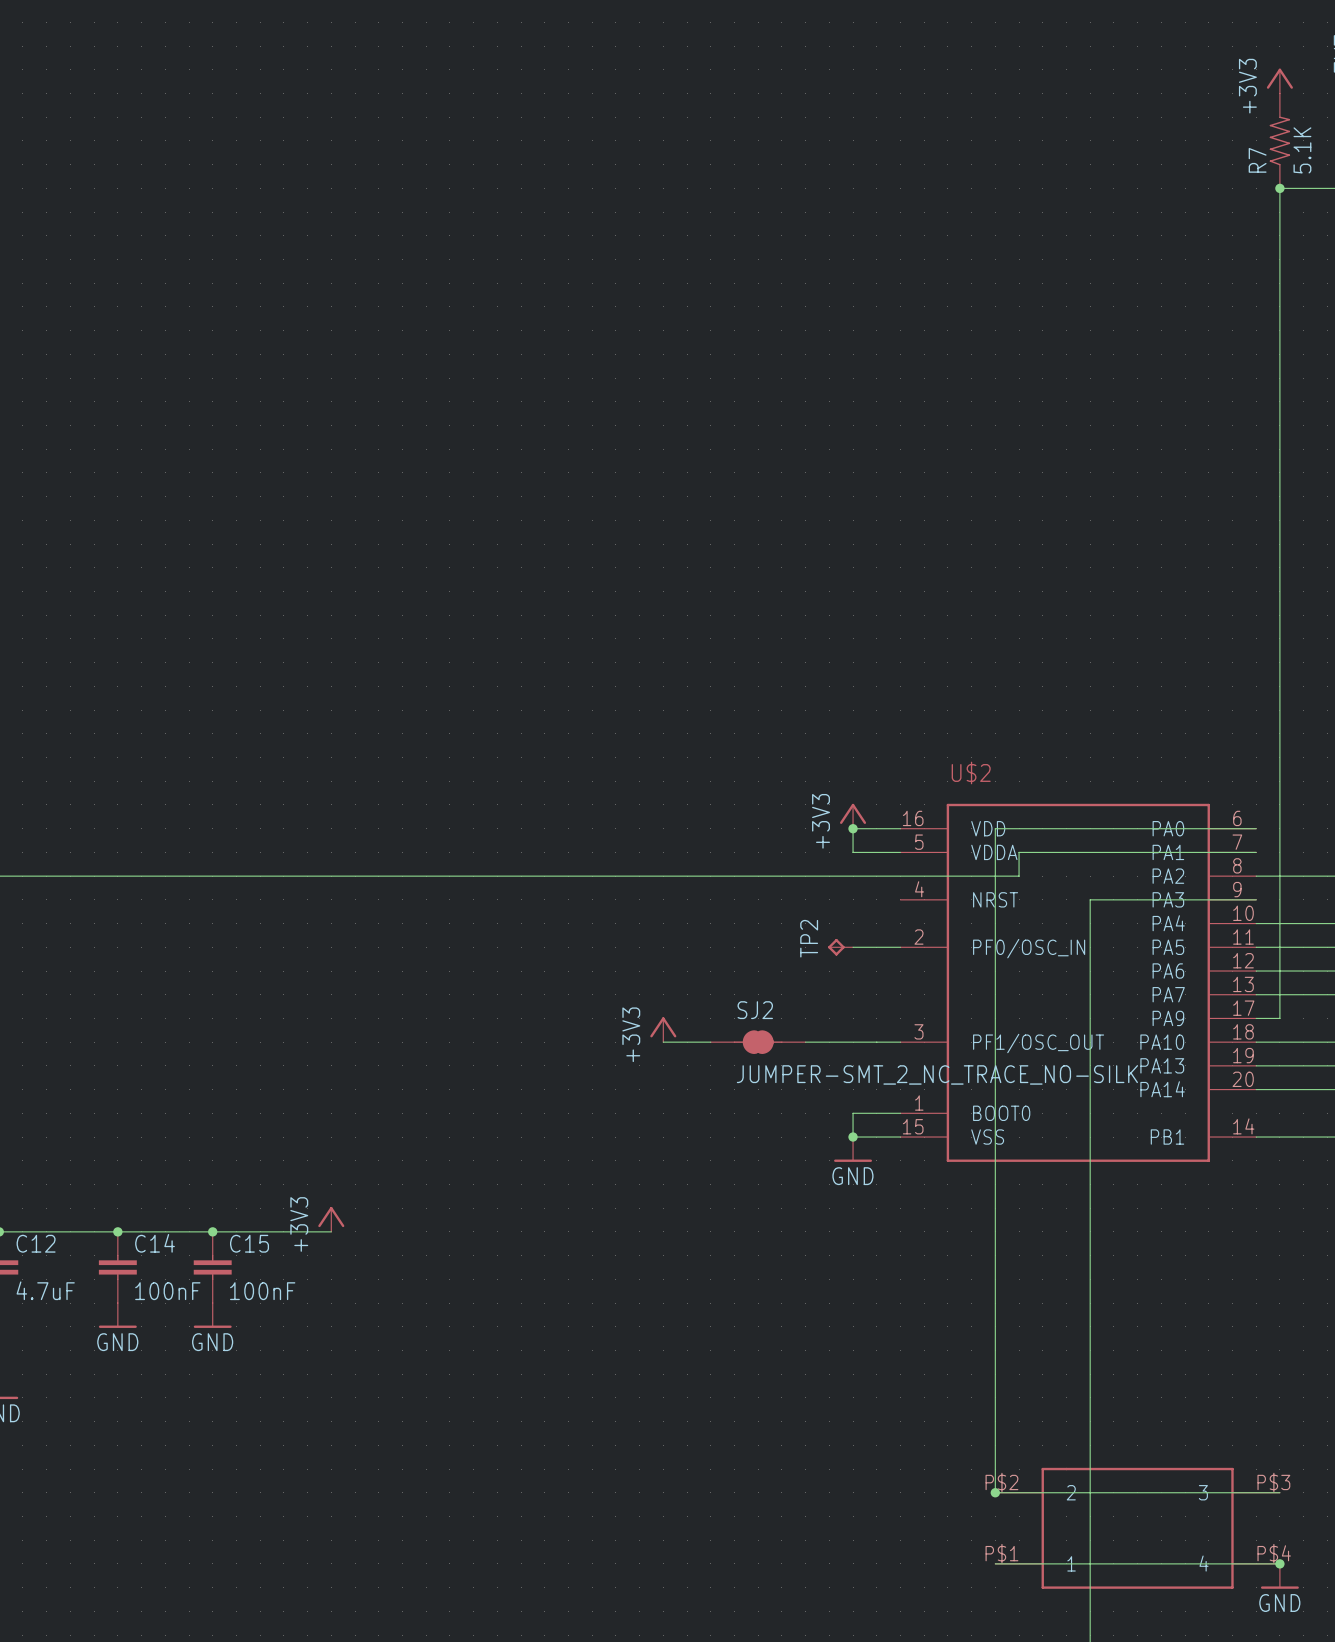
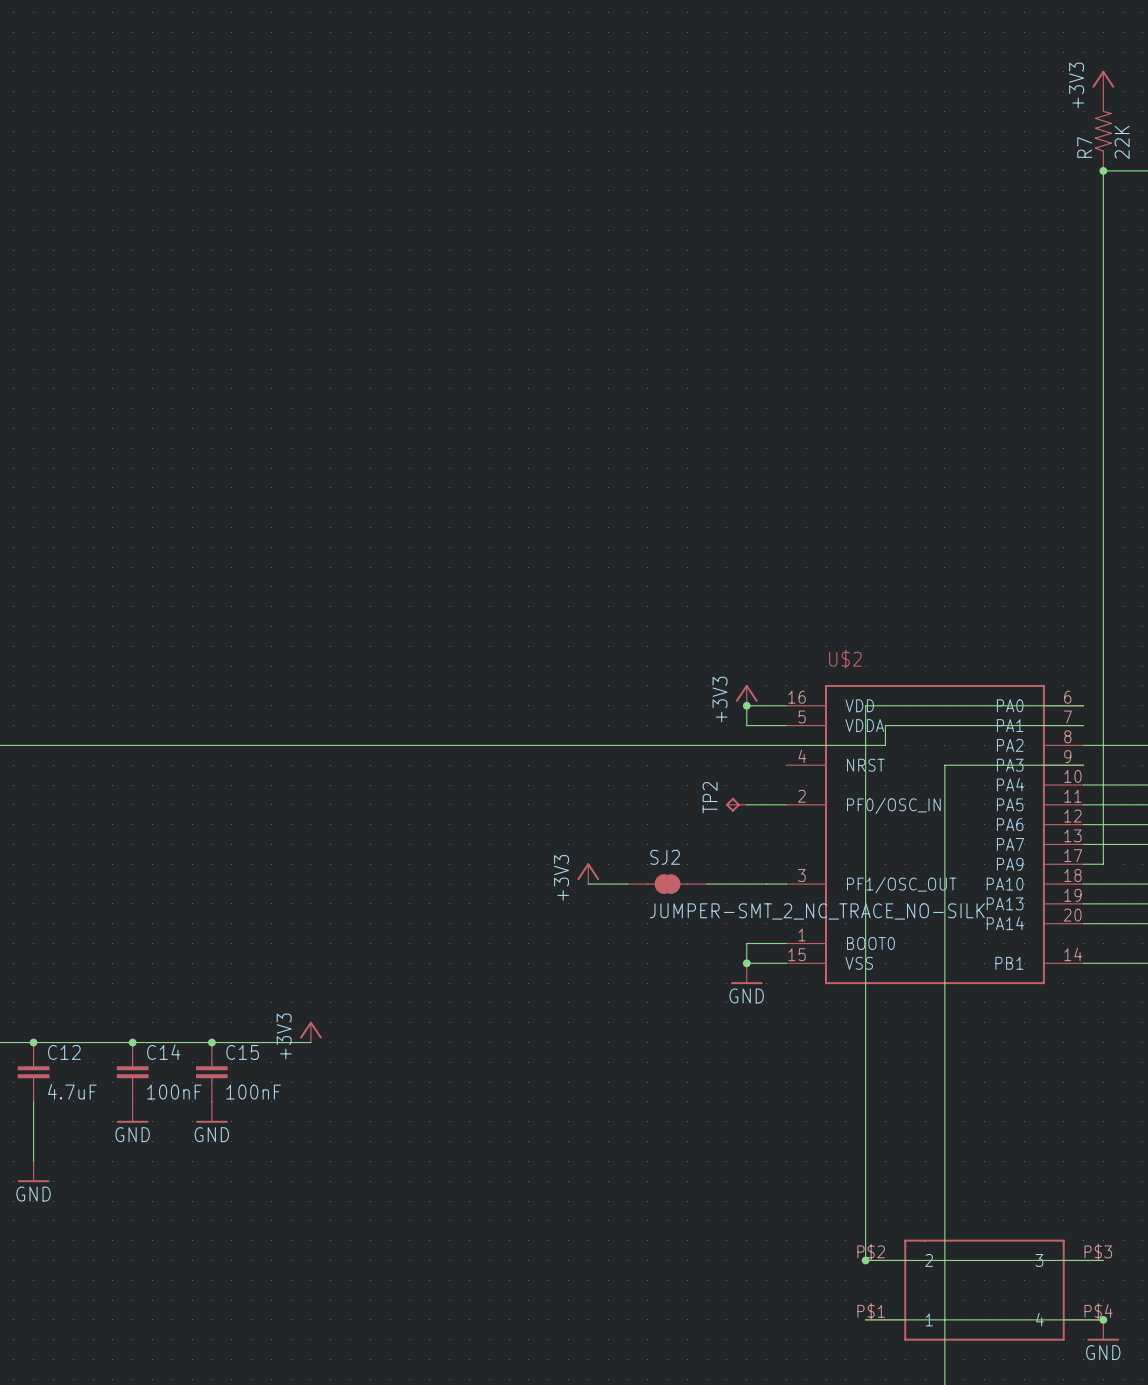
R7 value: 5.1K (1302, 150) -> 22K (1122, 142)

